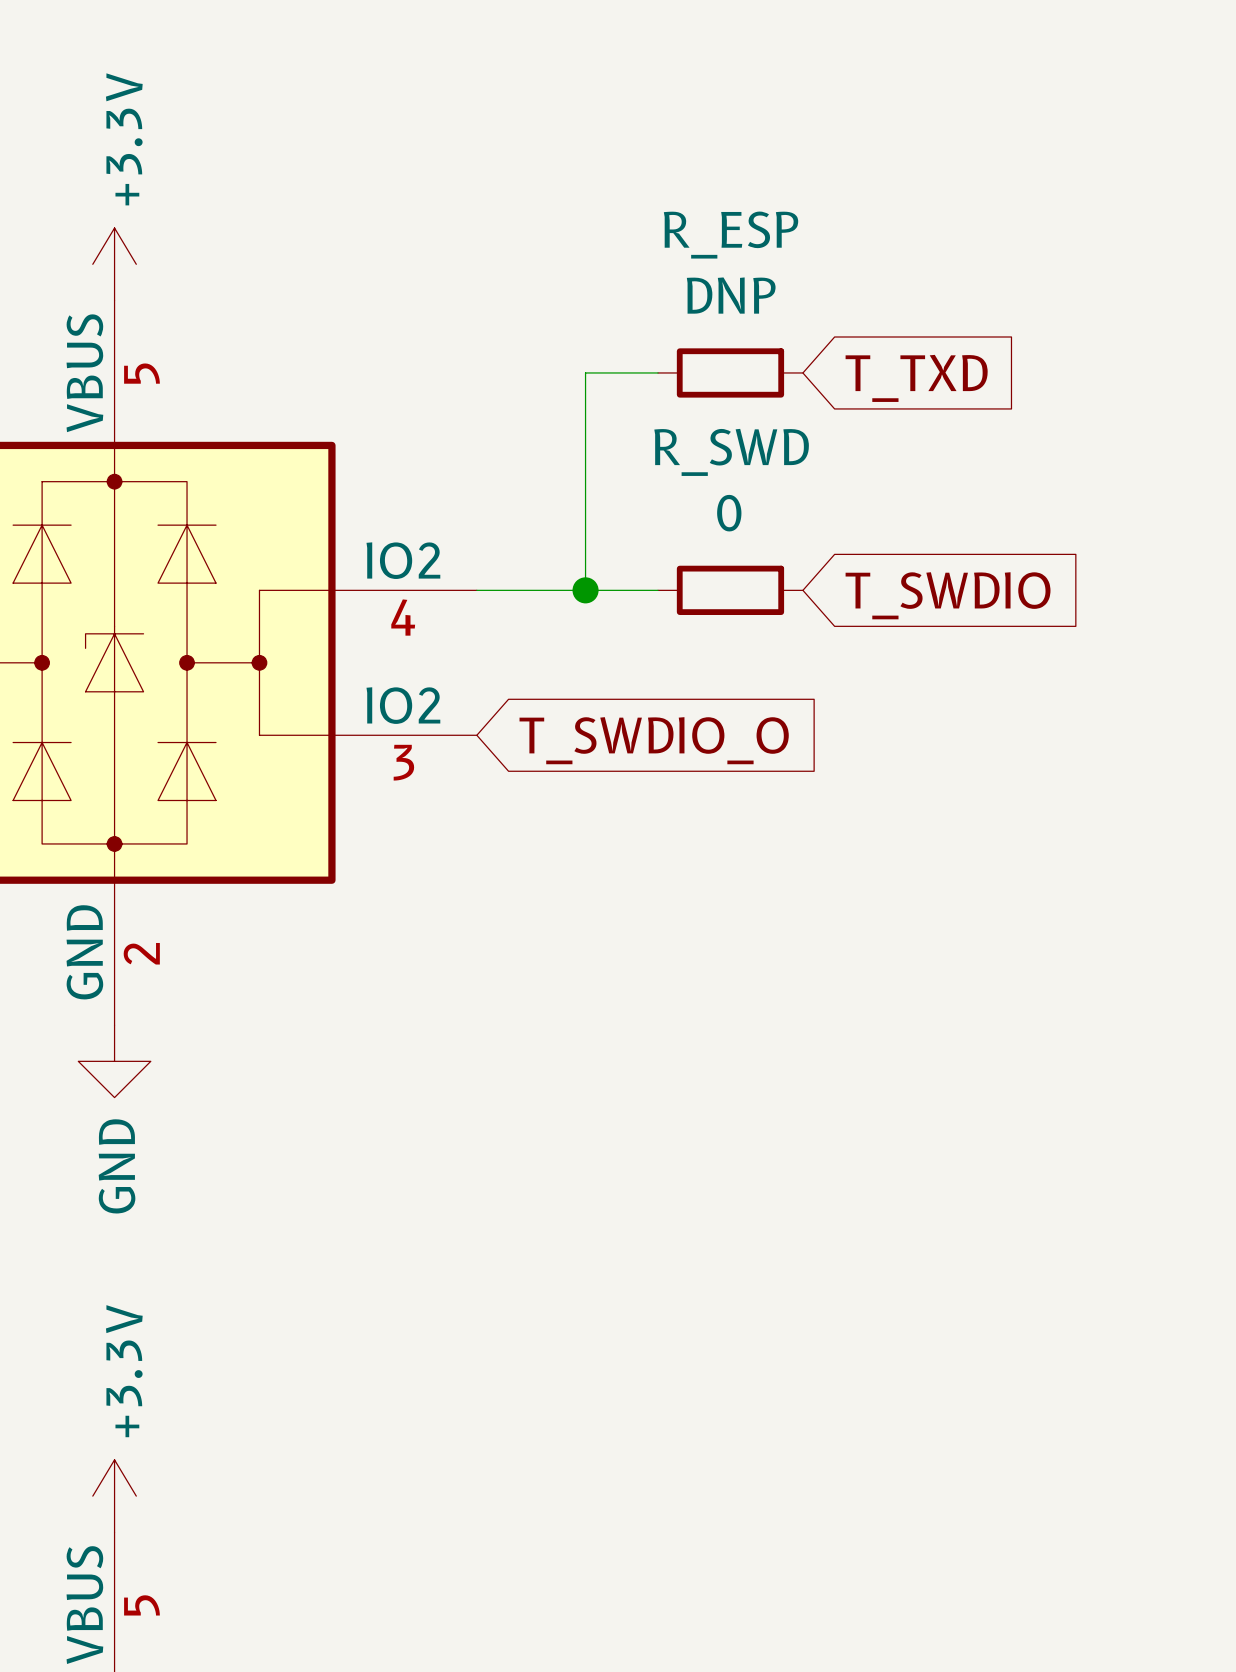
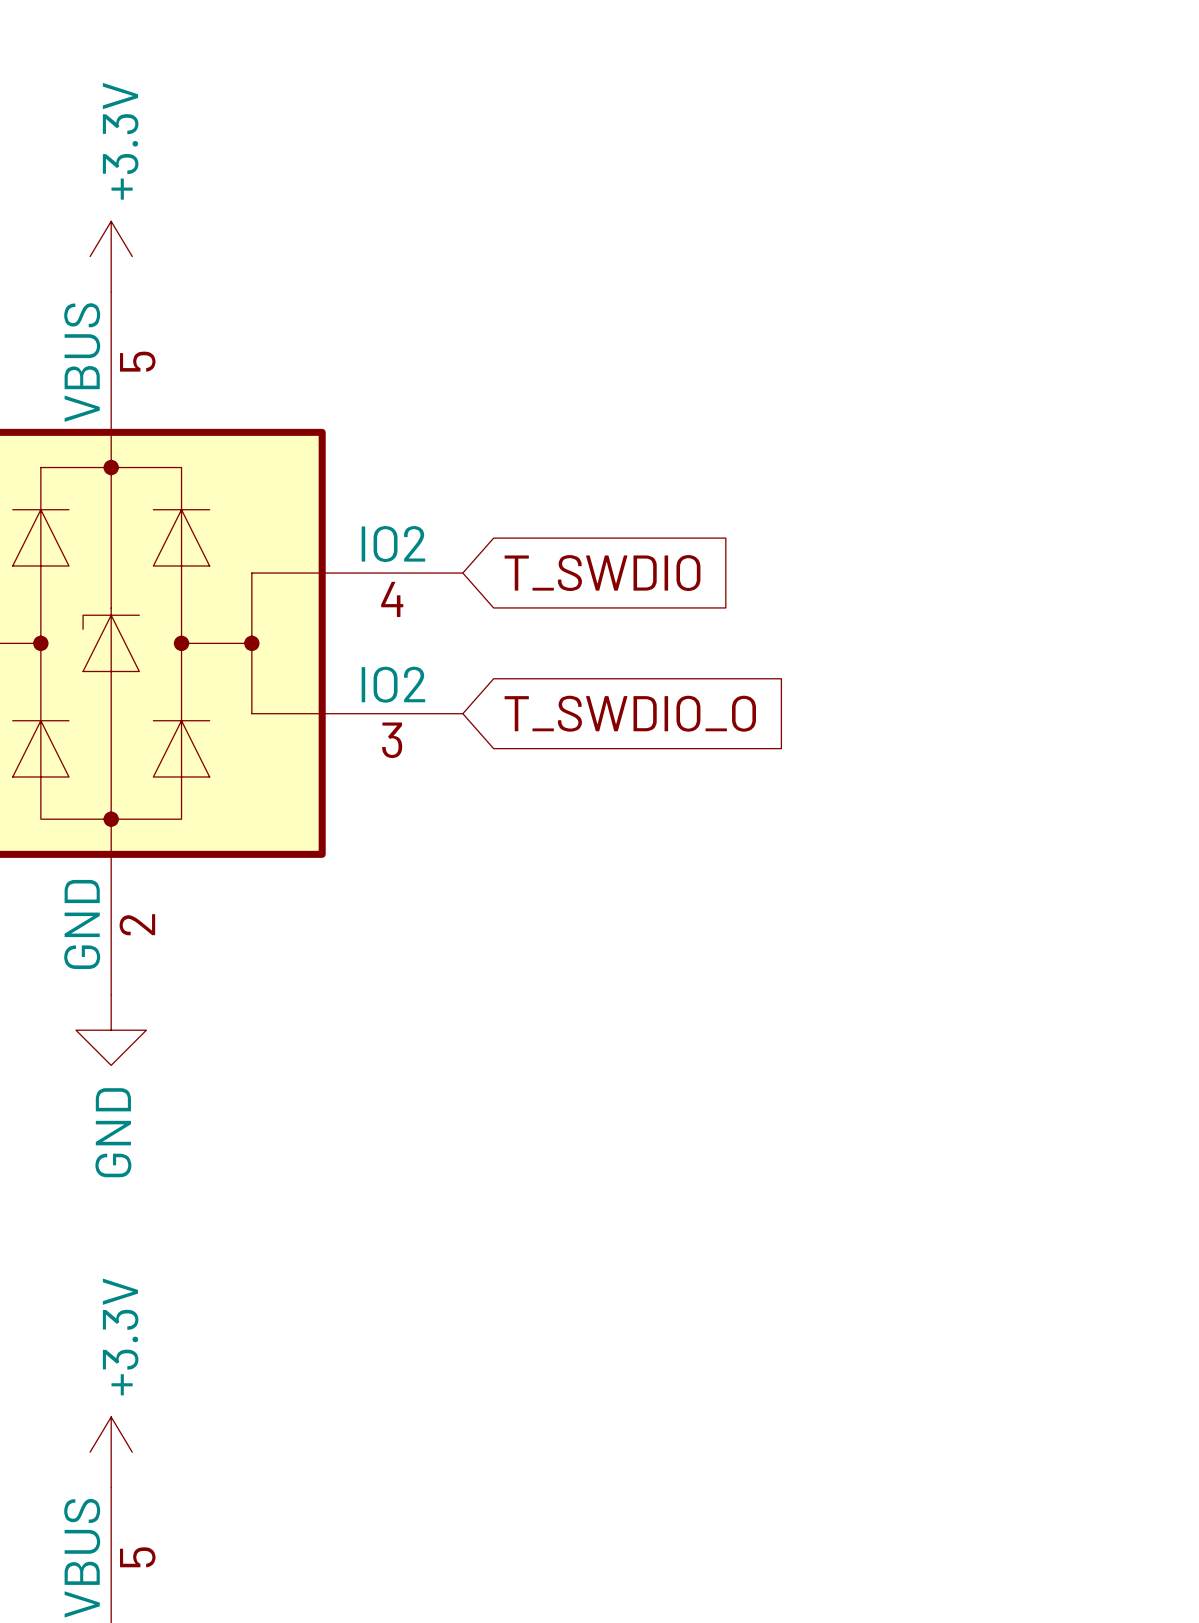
wire: (658, 372) (585, 372) (585, 590) -> none
R_ESP: DNP (730, 372) -> none
global label: T_TXD (916, 378) -> none
wire: (476, 590) (658, 590) -> none
junction: (585, 590) -> none
R_SWD: 0 (730, 590) -> none
global label position: T_SWDIO (948, 595) -> T_SWDIO (602, 573)

